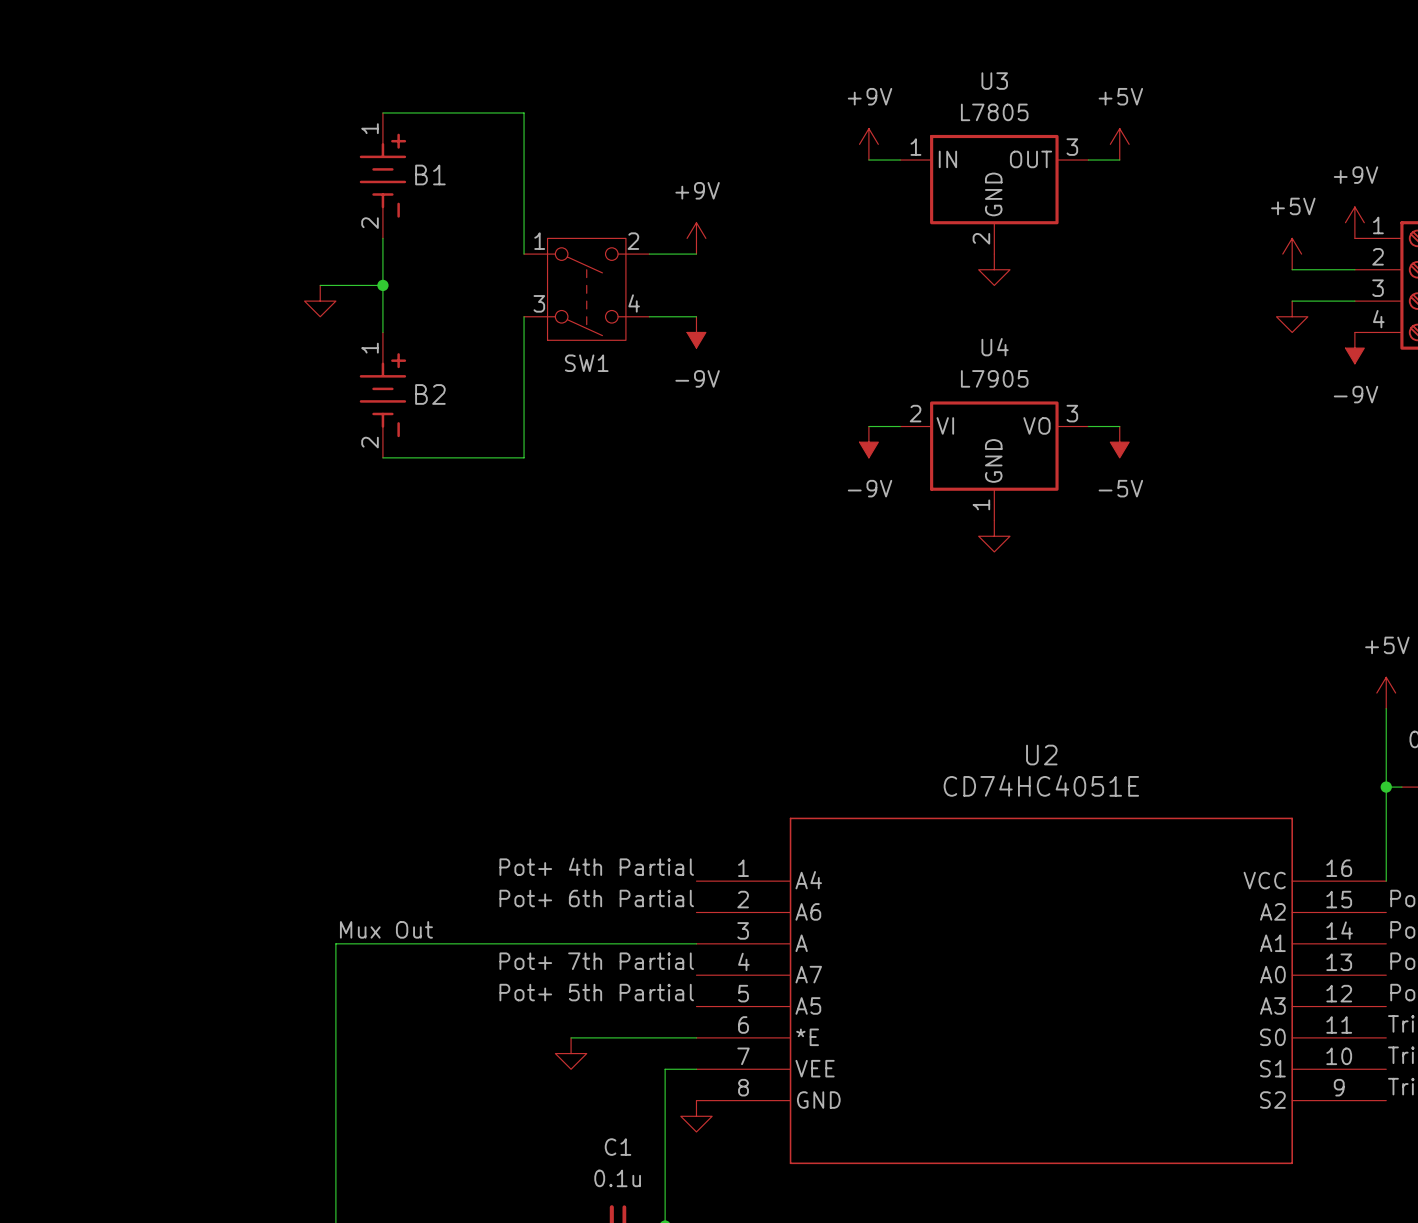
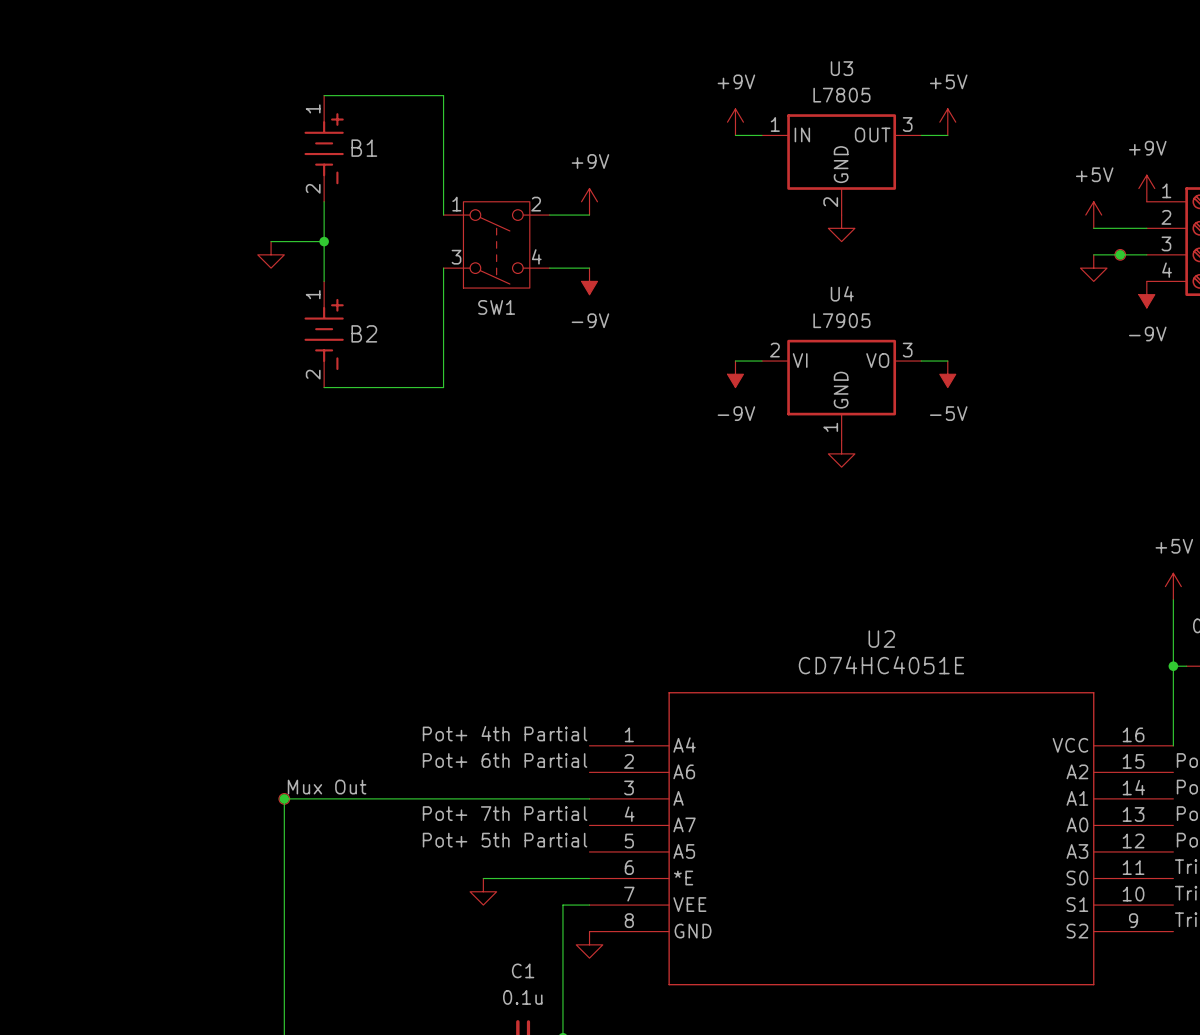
junction: none -> (1120, 254)
part: none -> (1120, 254)
junction: none -> (284, 798)
part: none -> (284, 798)

